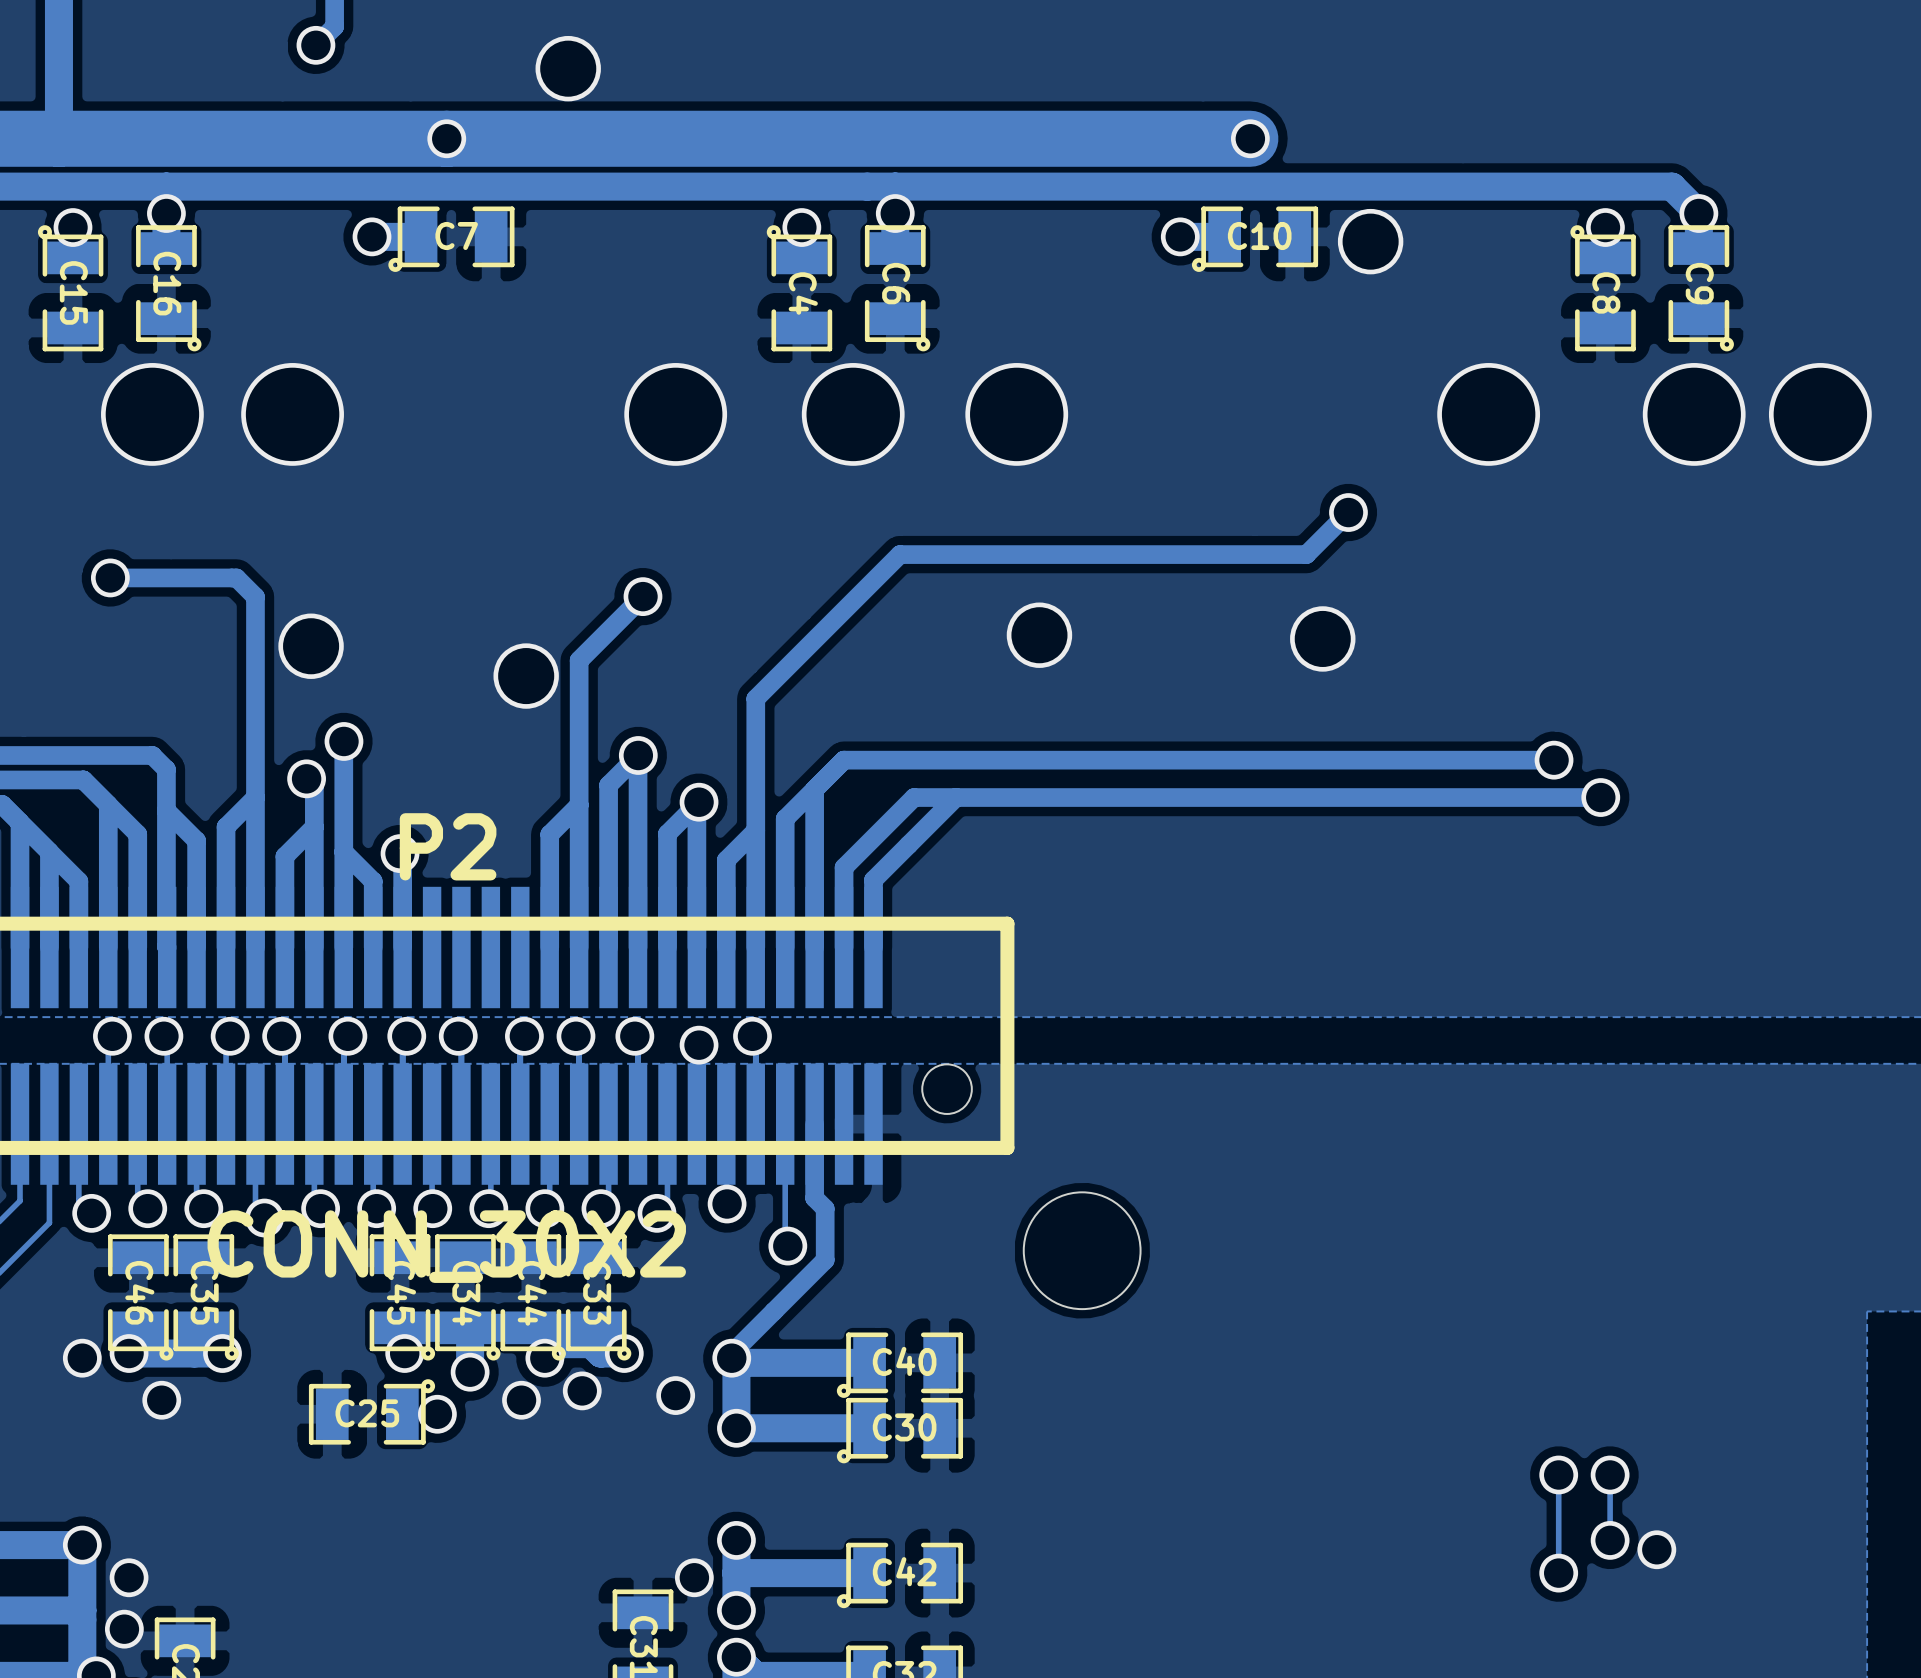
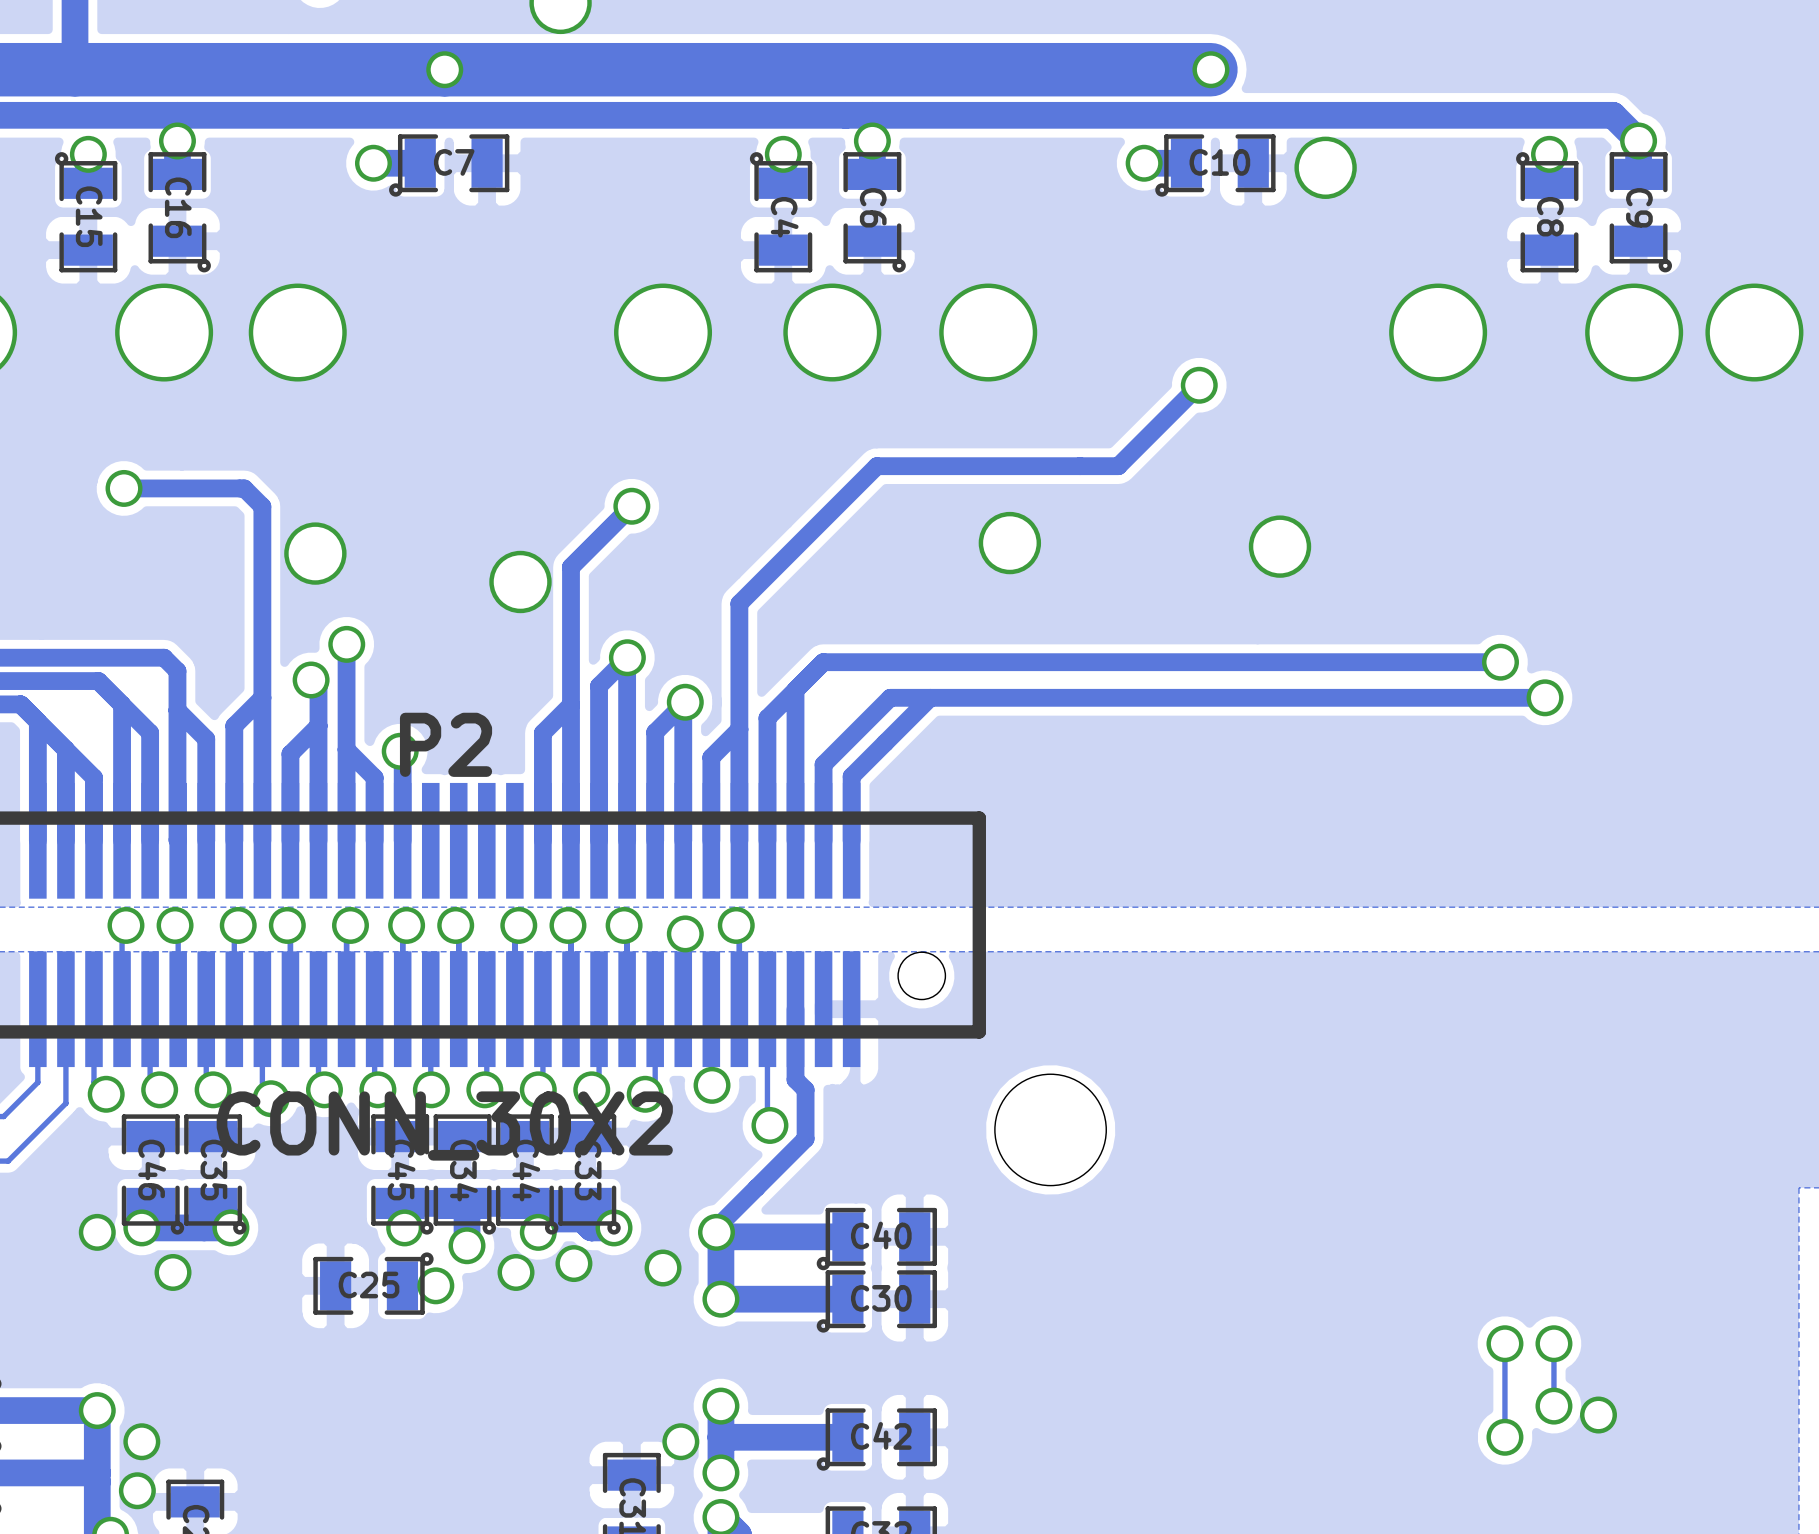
track: (1348, 512) (1306, 554) (1153, 554) -> (1199, 385) (1118, 466)
via position: (1348, 512) -> (1199, 385)

